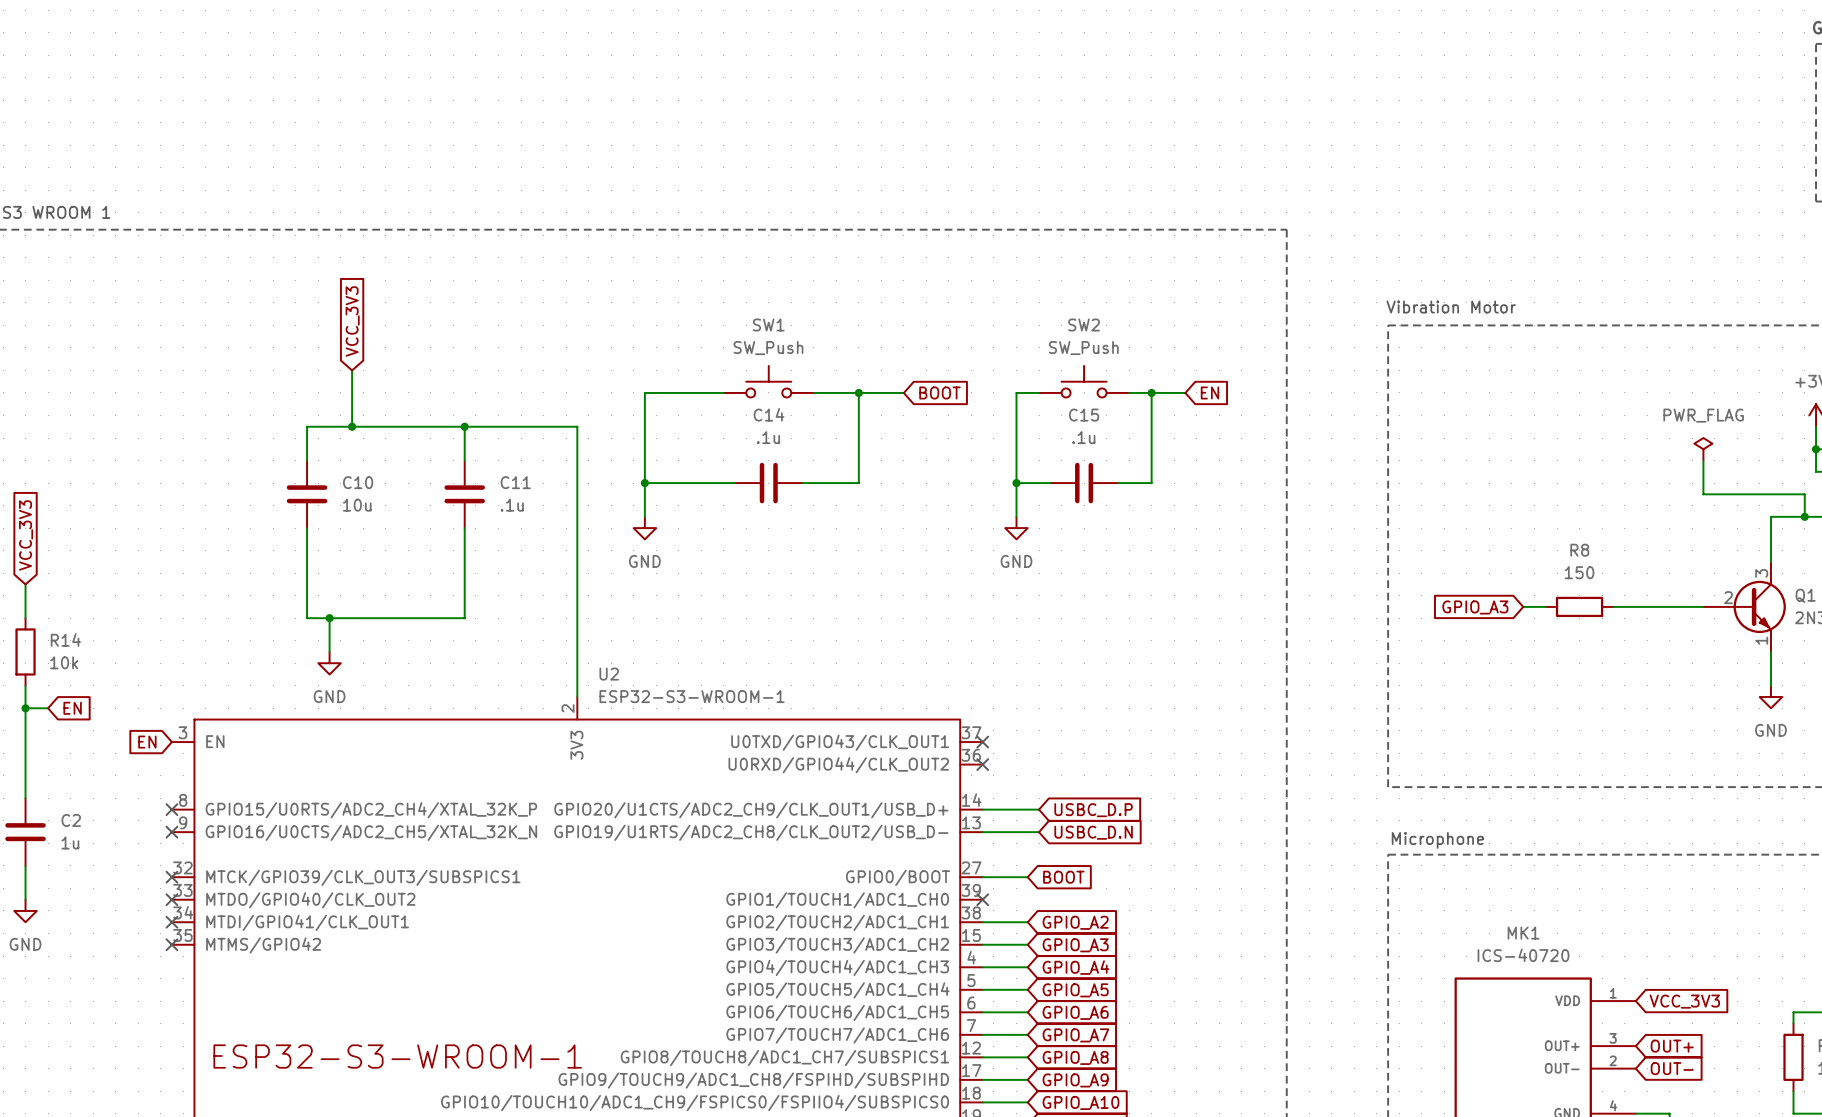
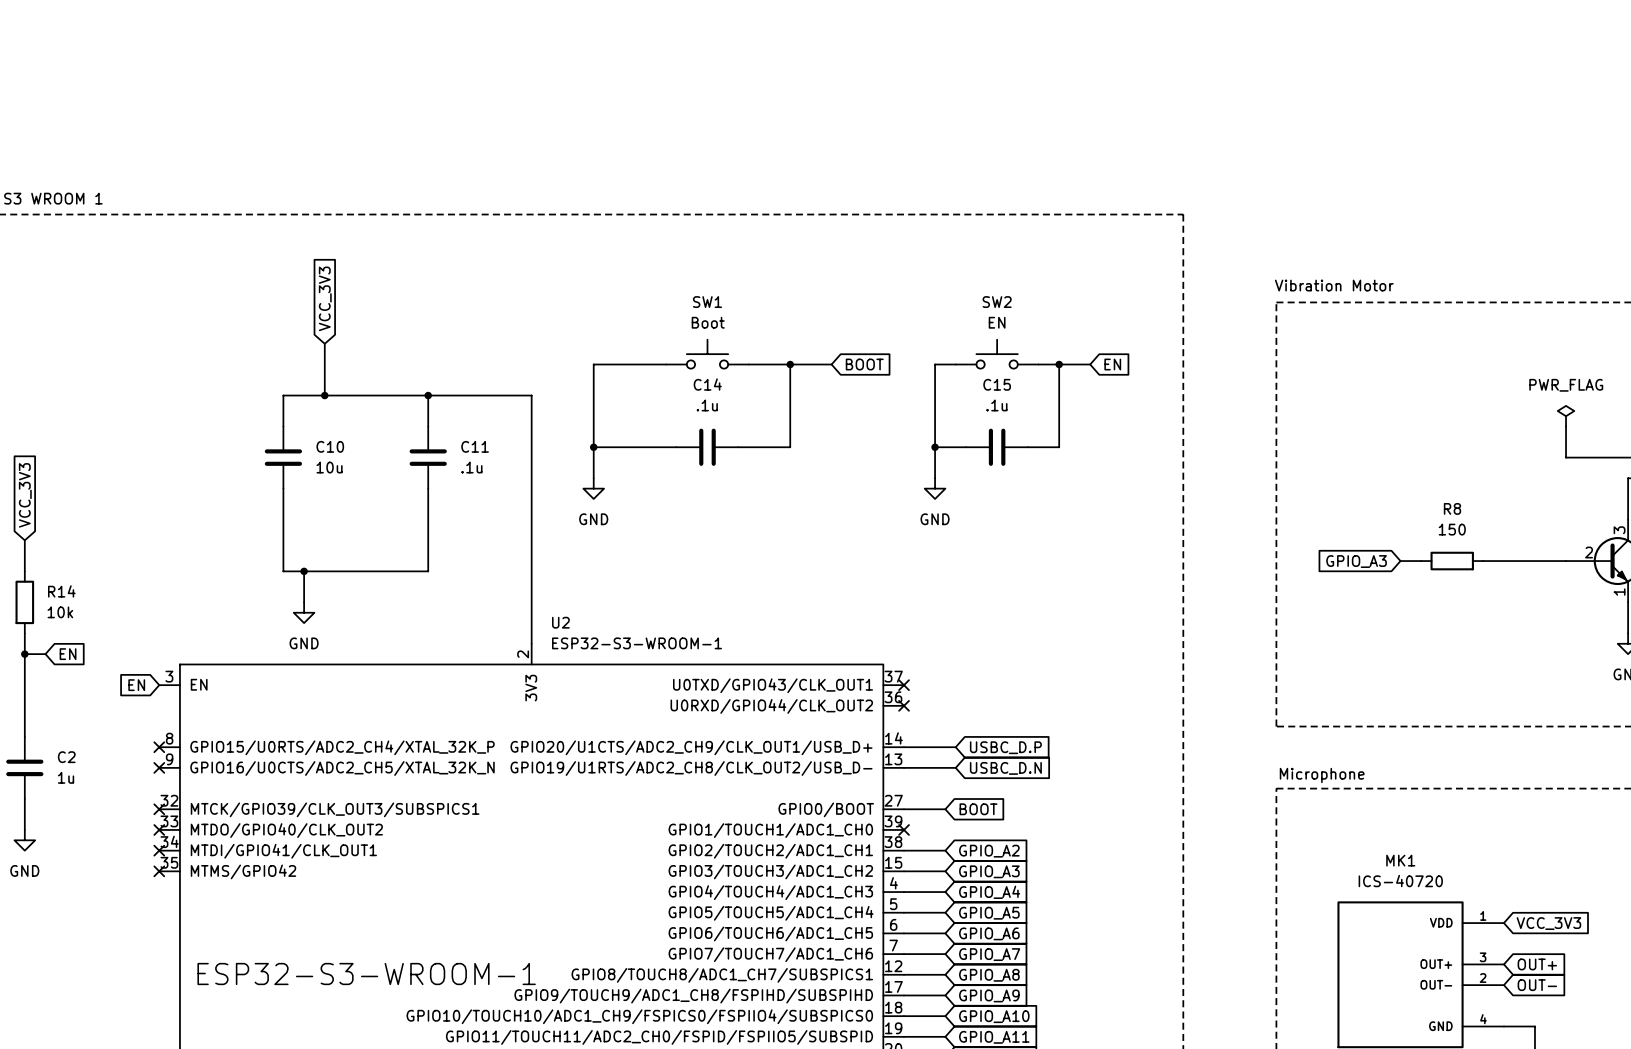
SW1 value: SW_Push (768, 348) -> Boot (708, 322)
SW2 value: SW_Push (1083, 348) -> EN (997, 322)

